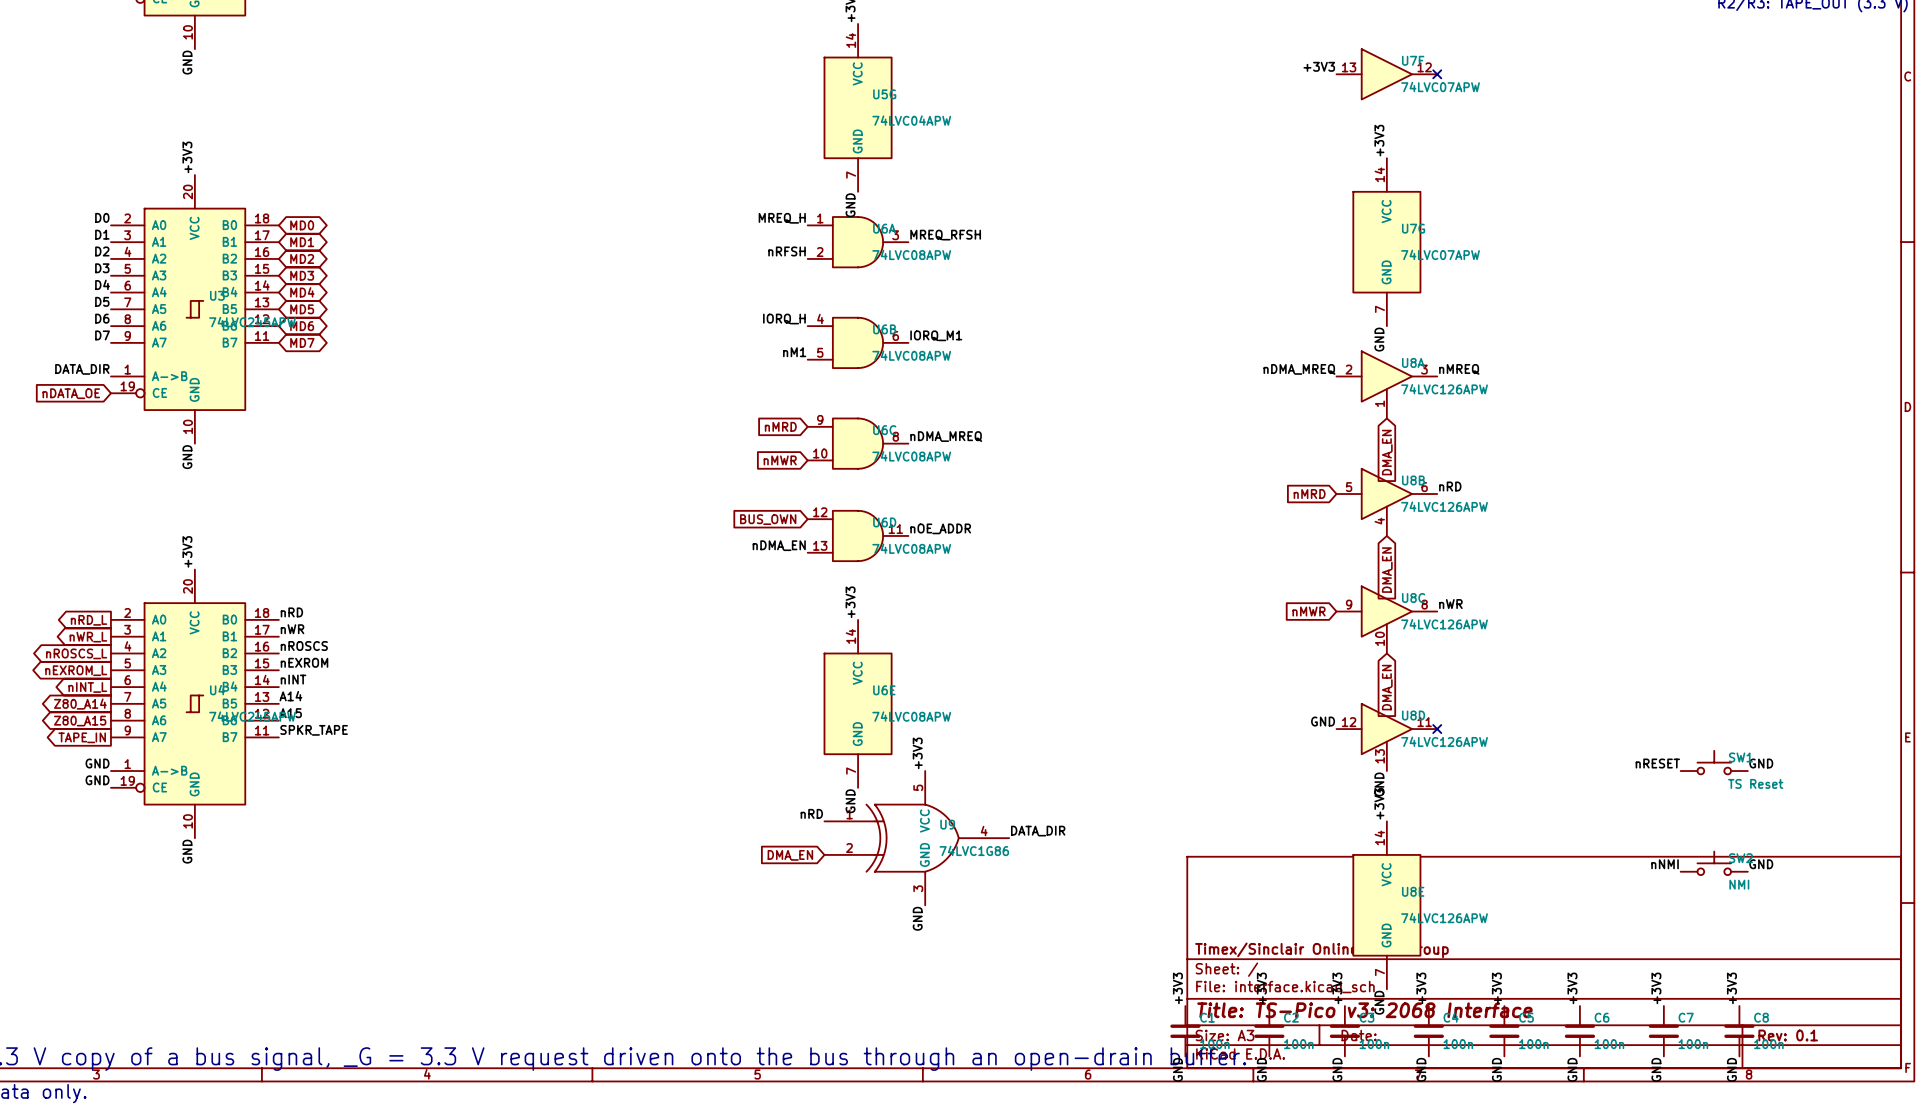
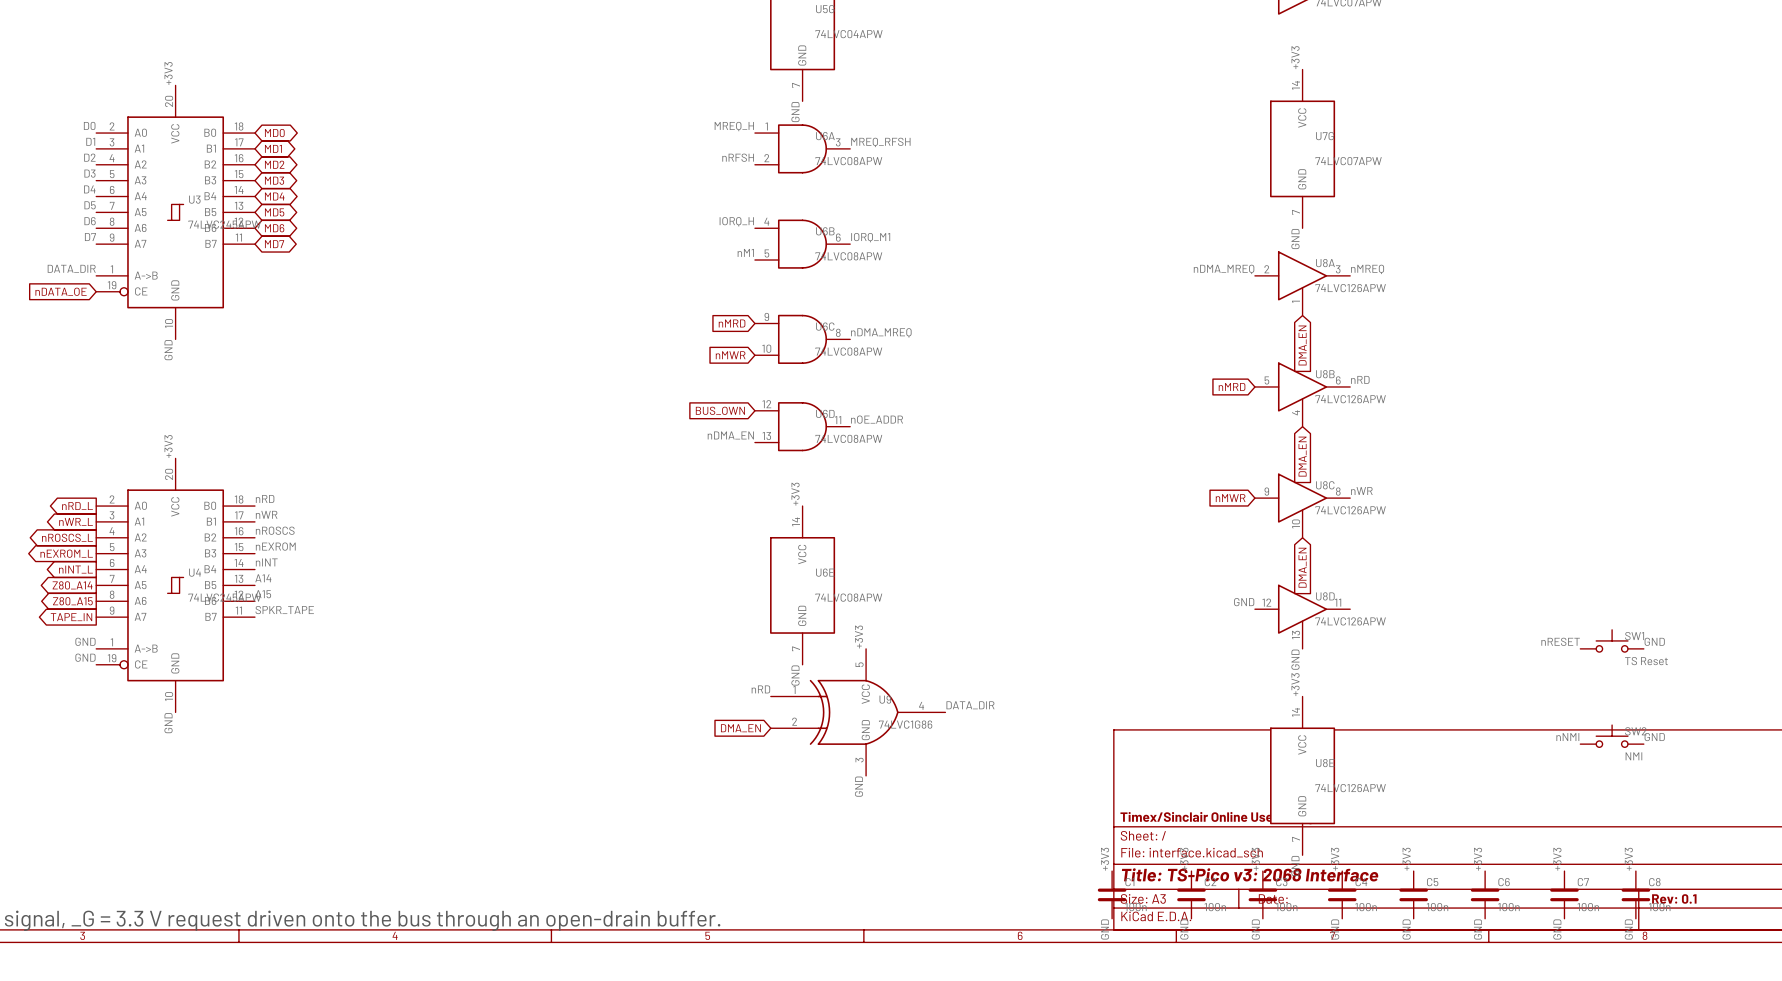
no-connect mark: (1437, 729) -> none

